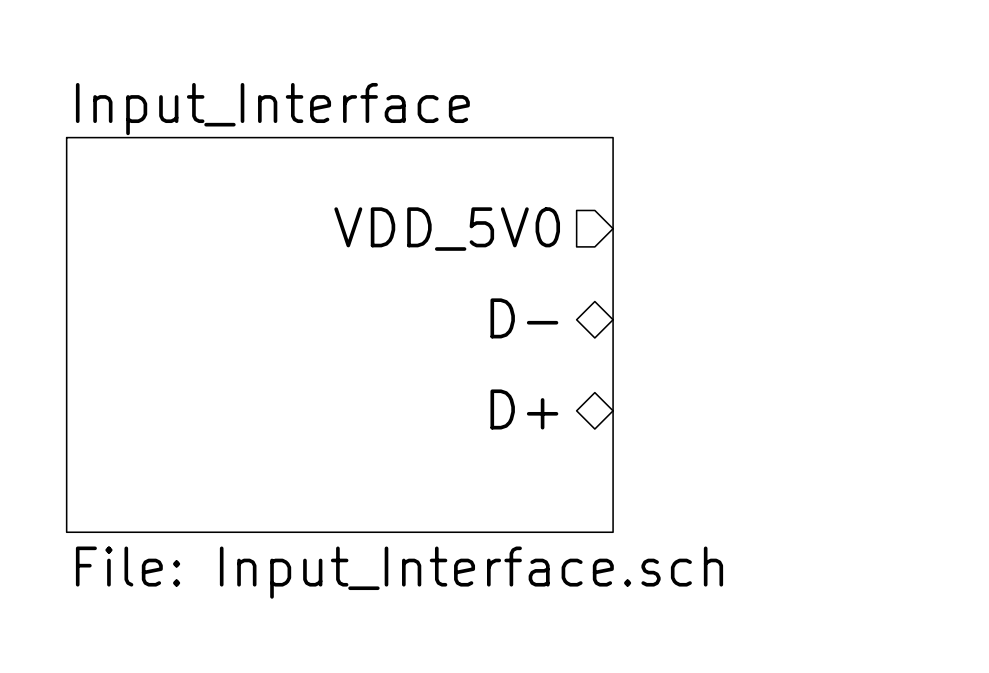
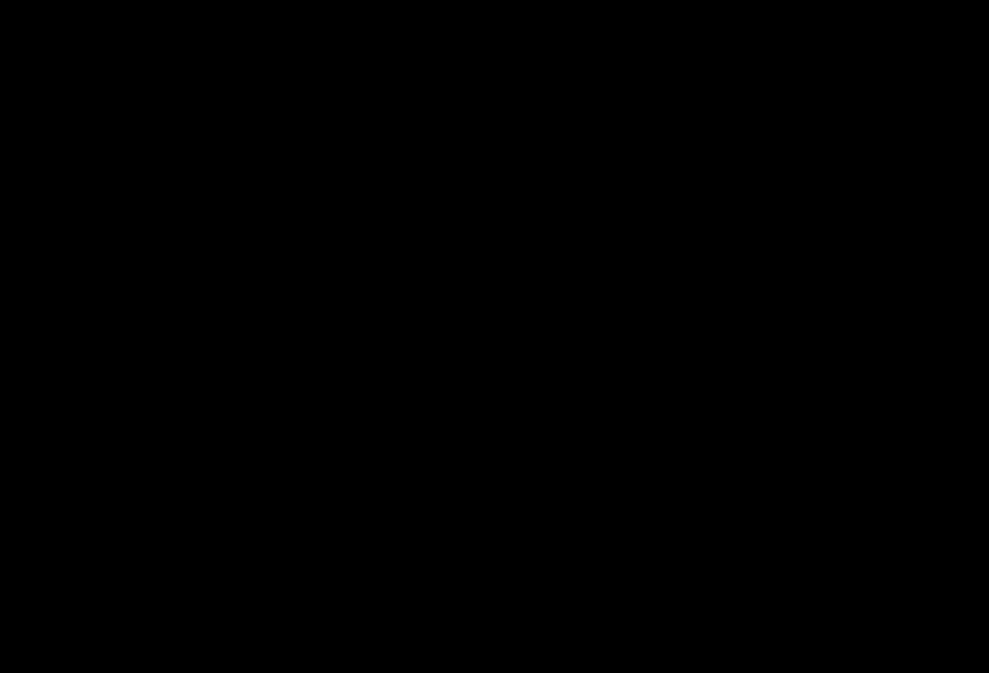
sheet pin: VDD_5V0 (447, 229) -> none
sheet pin: D- (524, 318) -> none
sheet Input_Interface: File: Input_Interface.sch (339, 334) -> none
sheet pin: D+ (524, 409) -> none

